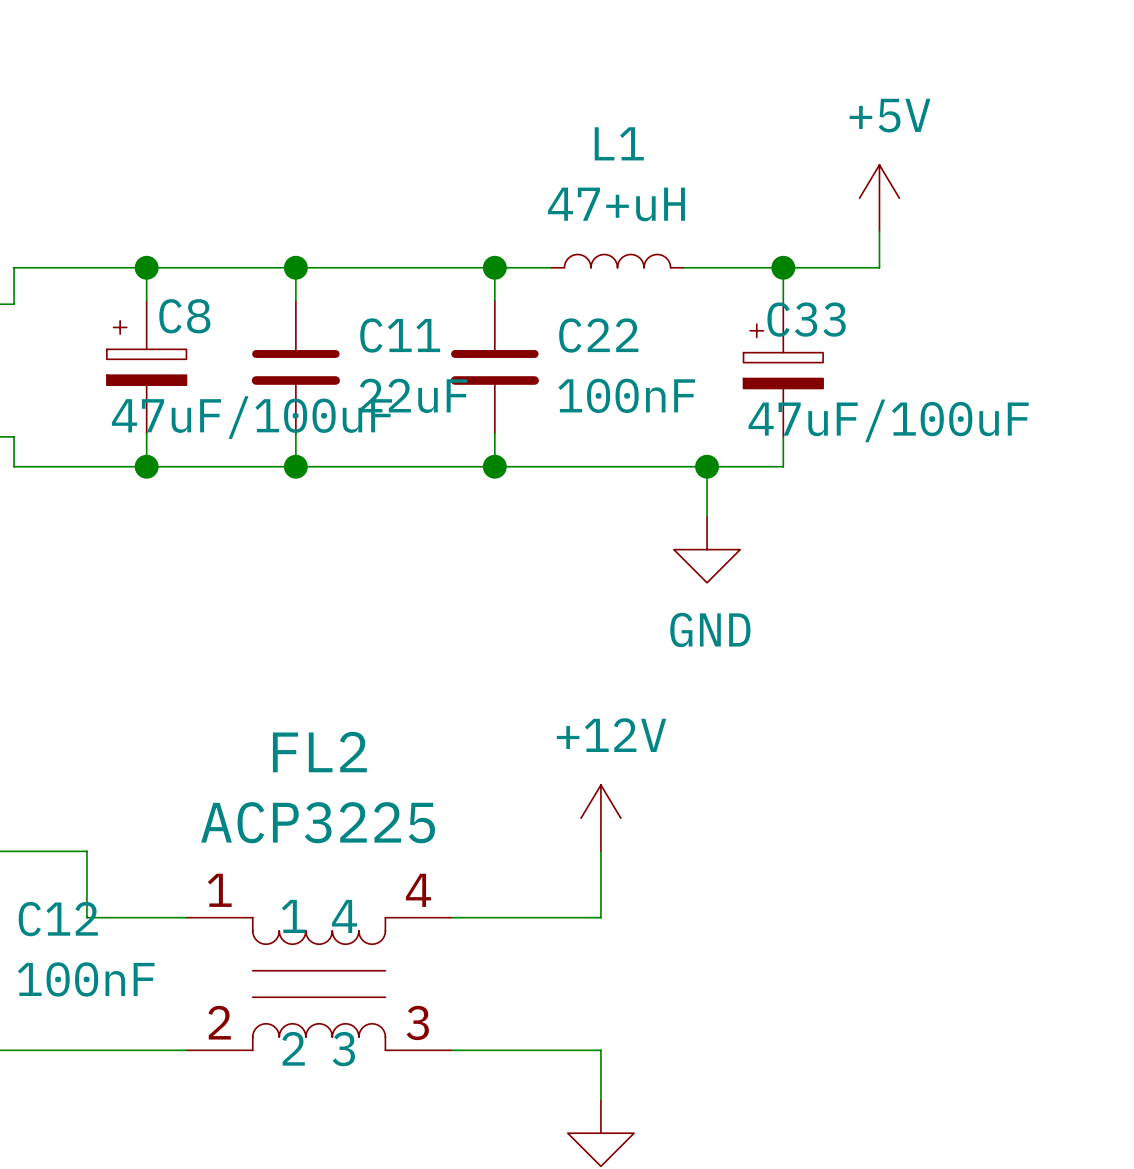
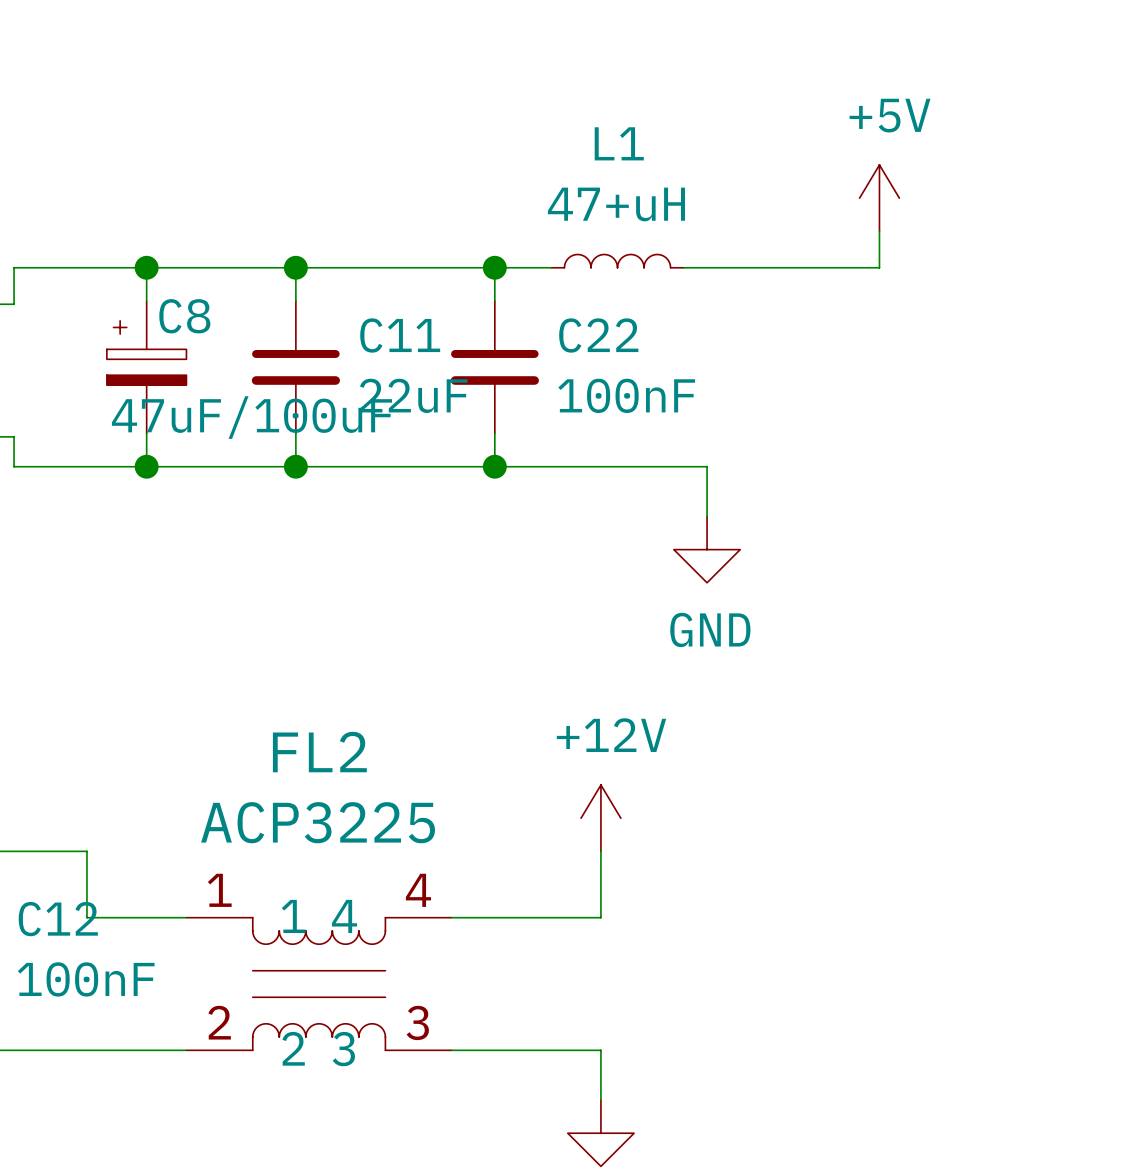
wire: (783, 267) (783, 304) -> none
junction: (783, 267) -> none
C33: 47uF/100uF (783, 370) -> none
wire: (783, 436) (783, 466) (707, 466) -> none
junction: (707, 466) -> none

